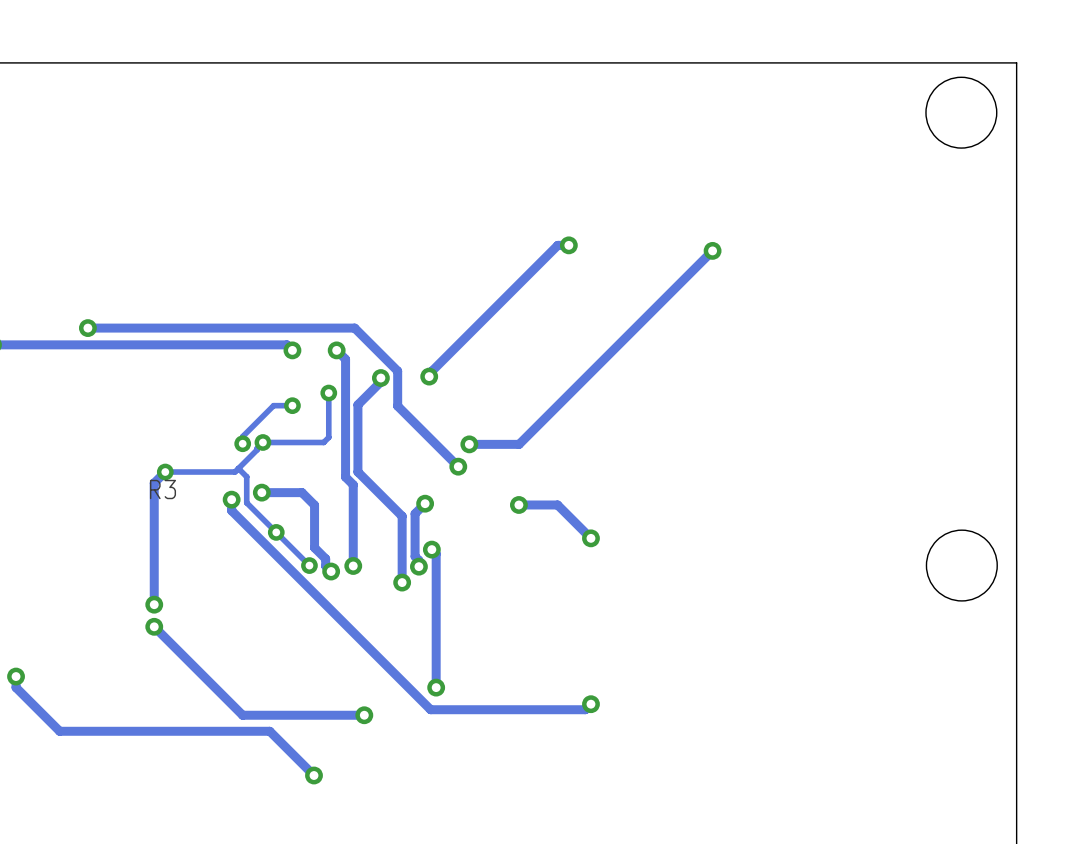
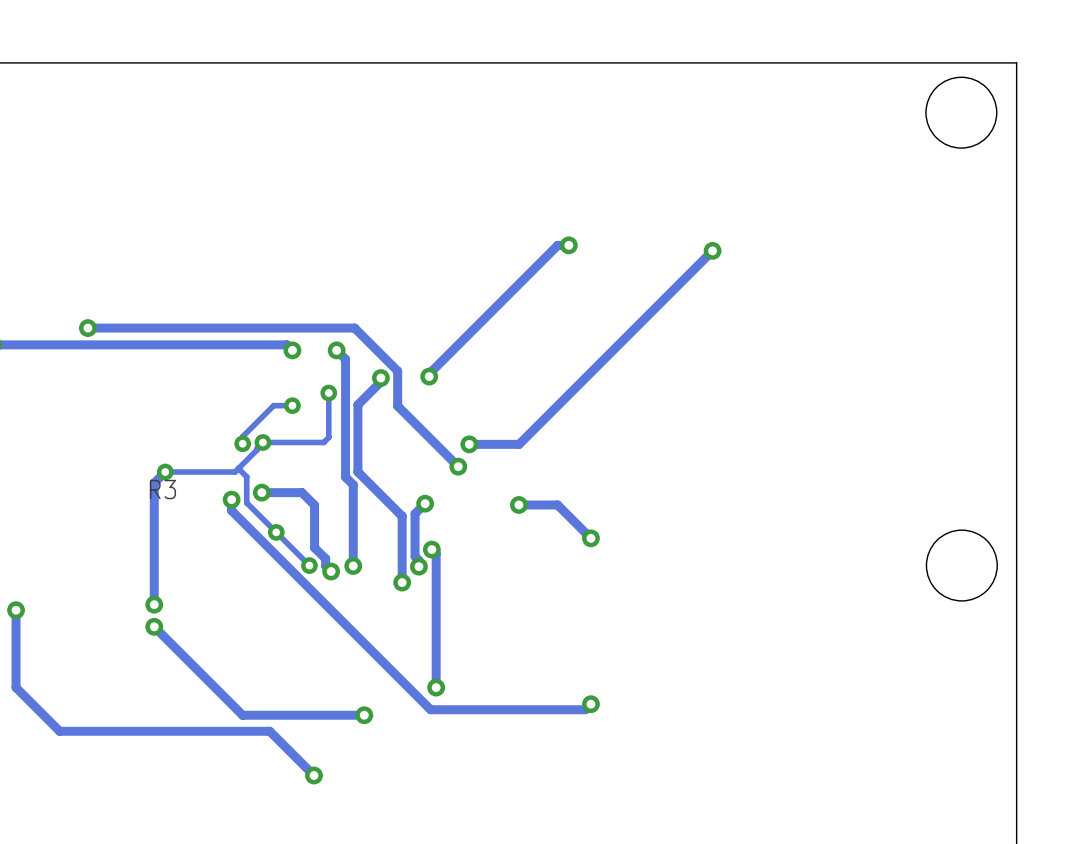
track: none -> (16, 610) (16, 676)
via position: (16, 676) -> (16, 610)

